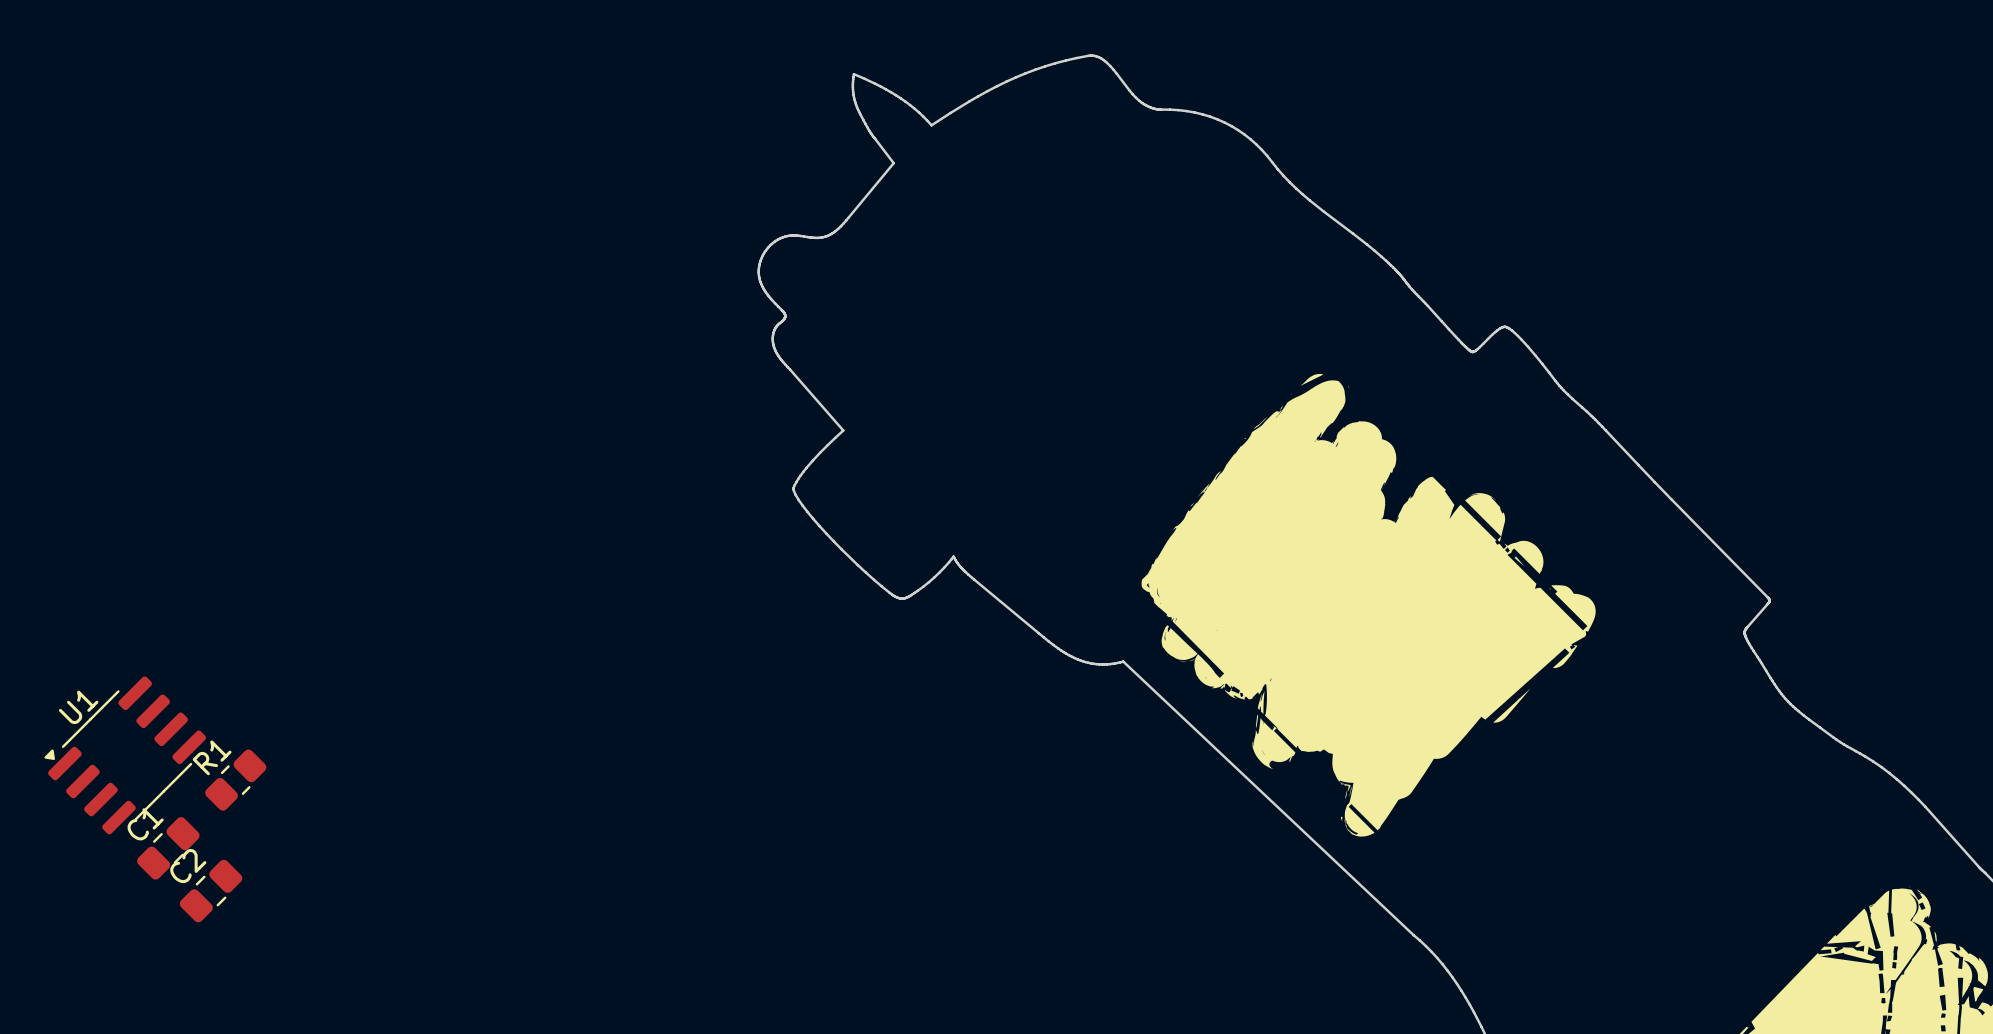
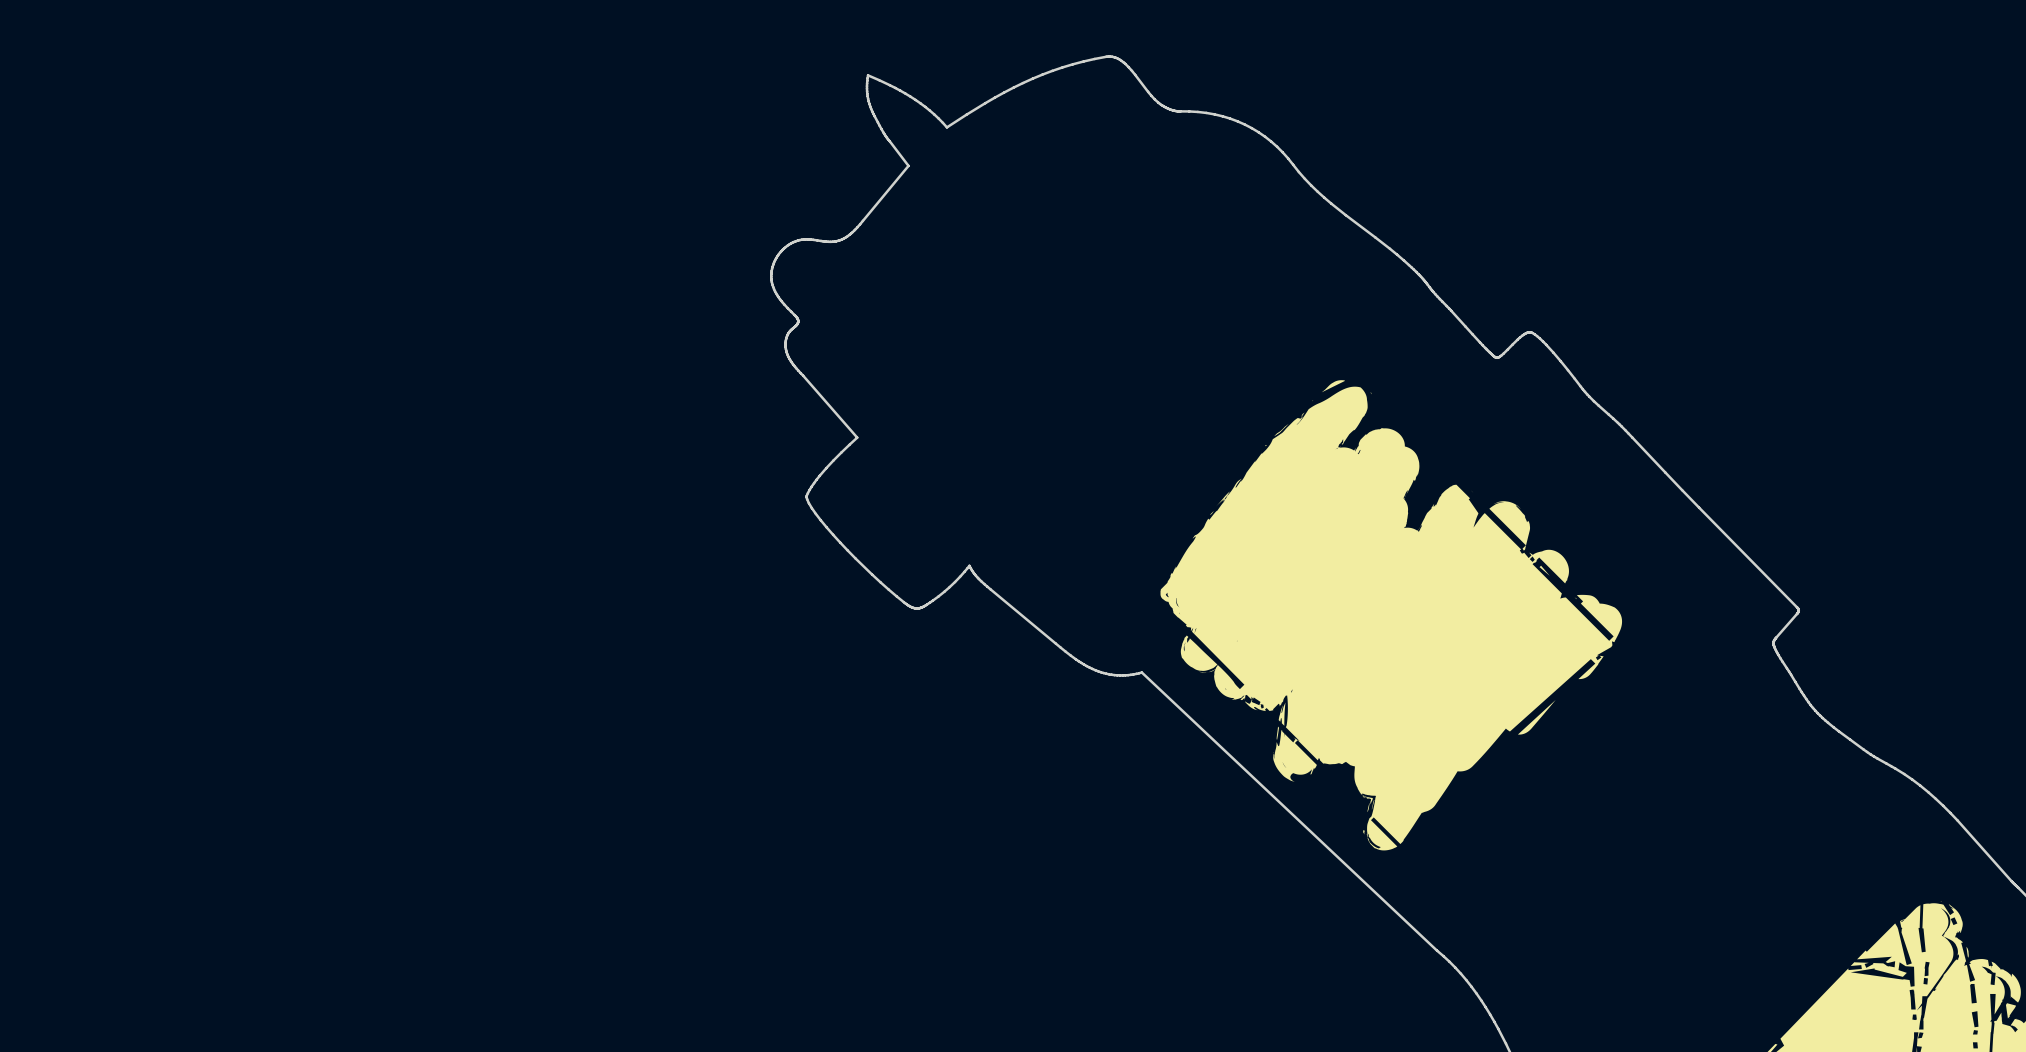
U1: (125, 755) -> none
R1: (235, 780) -> none
C1: (168, 848) -> none
C2: (211, 891) -> none

